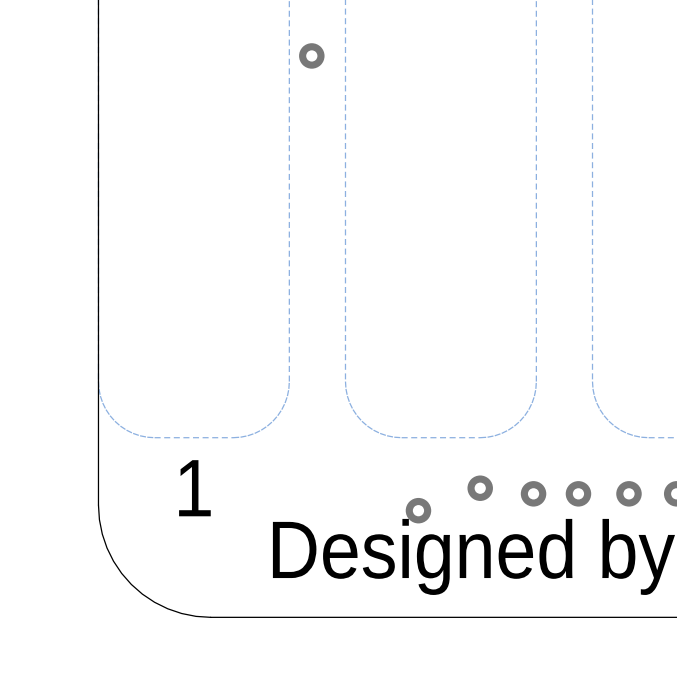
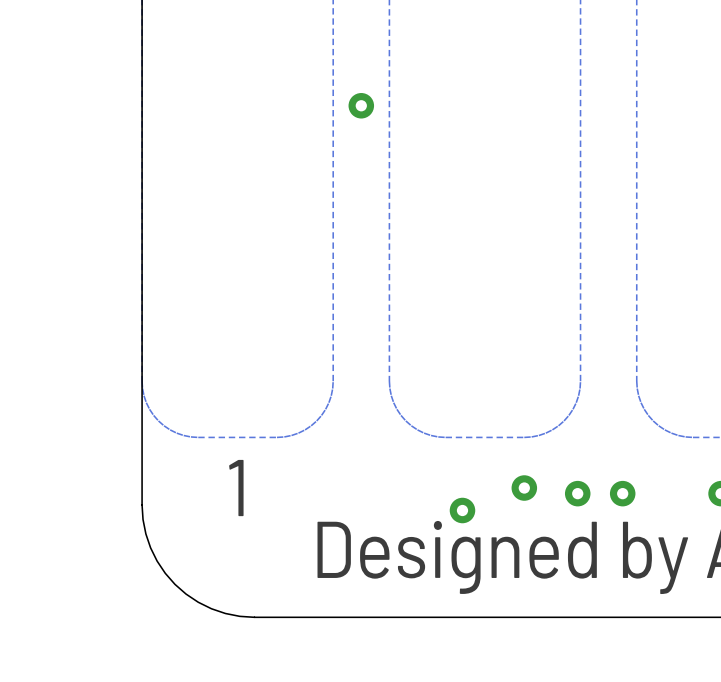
via position: (311, 55) -> (361, 105)
via: (628, 493) -> none

